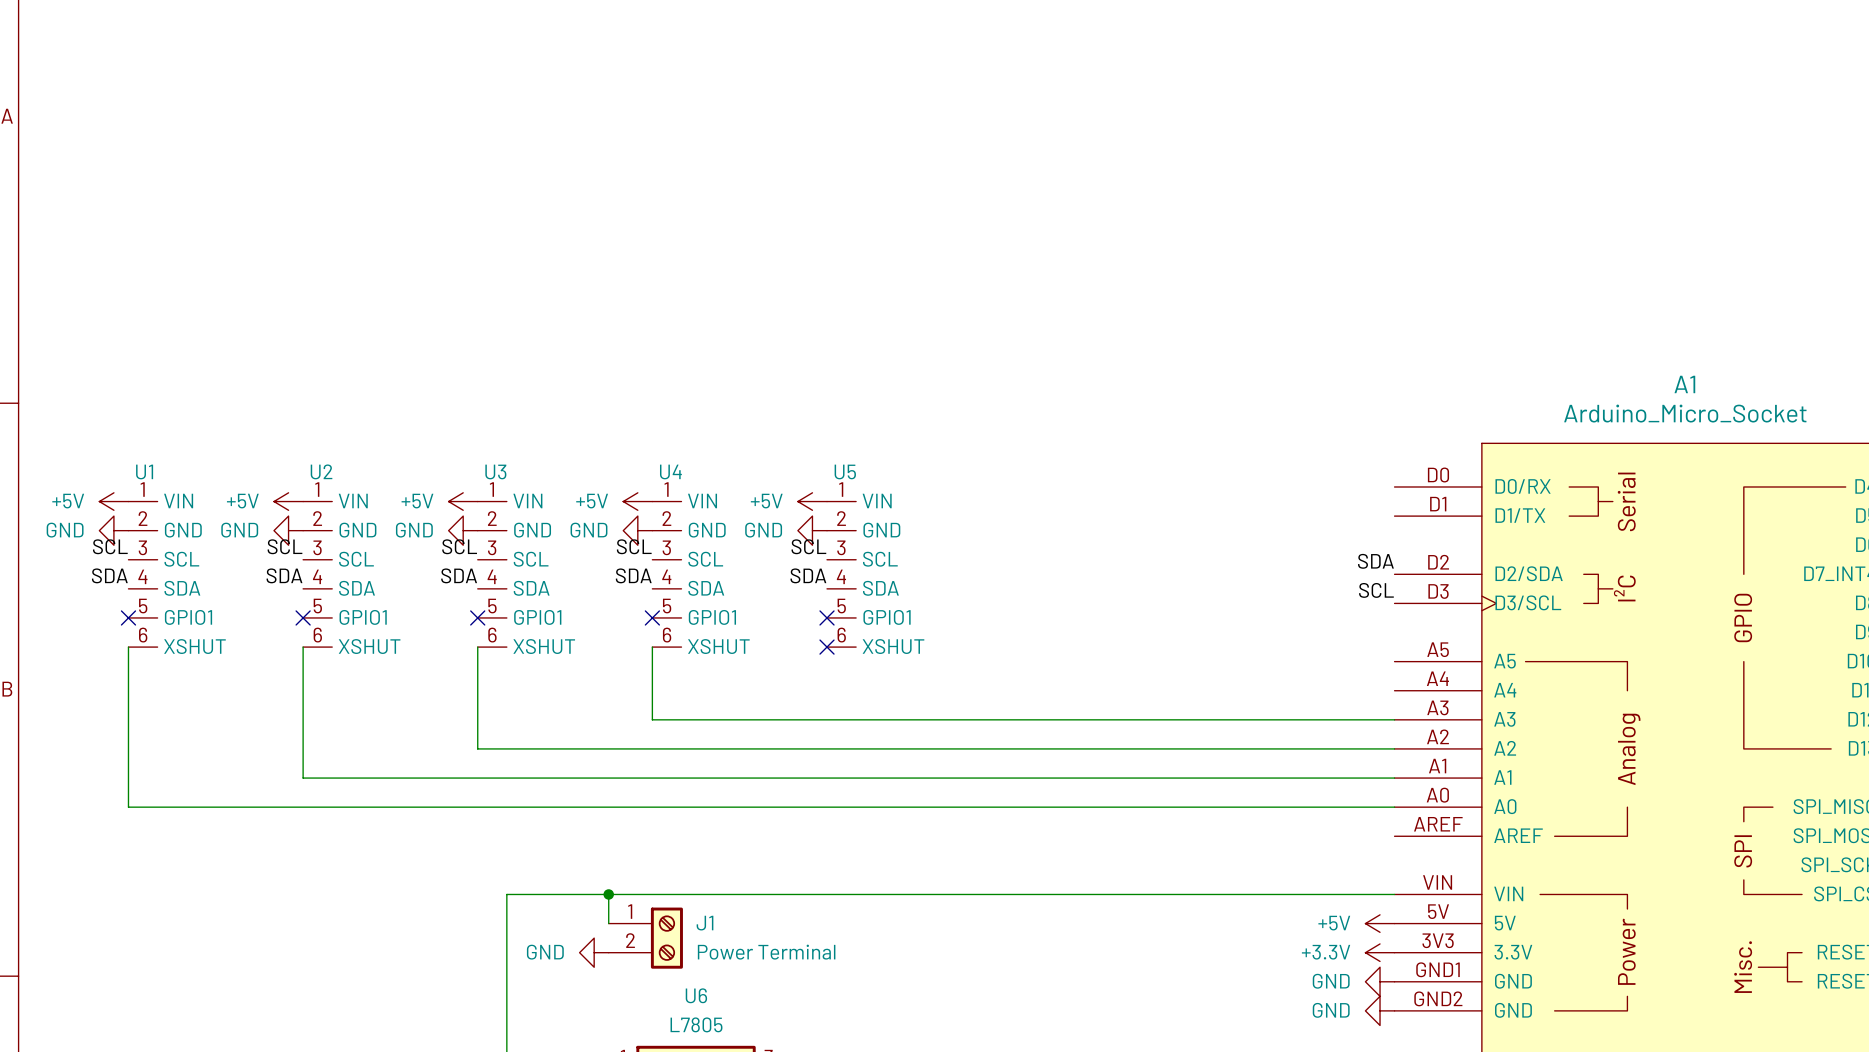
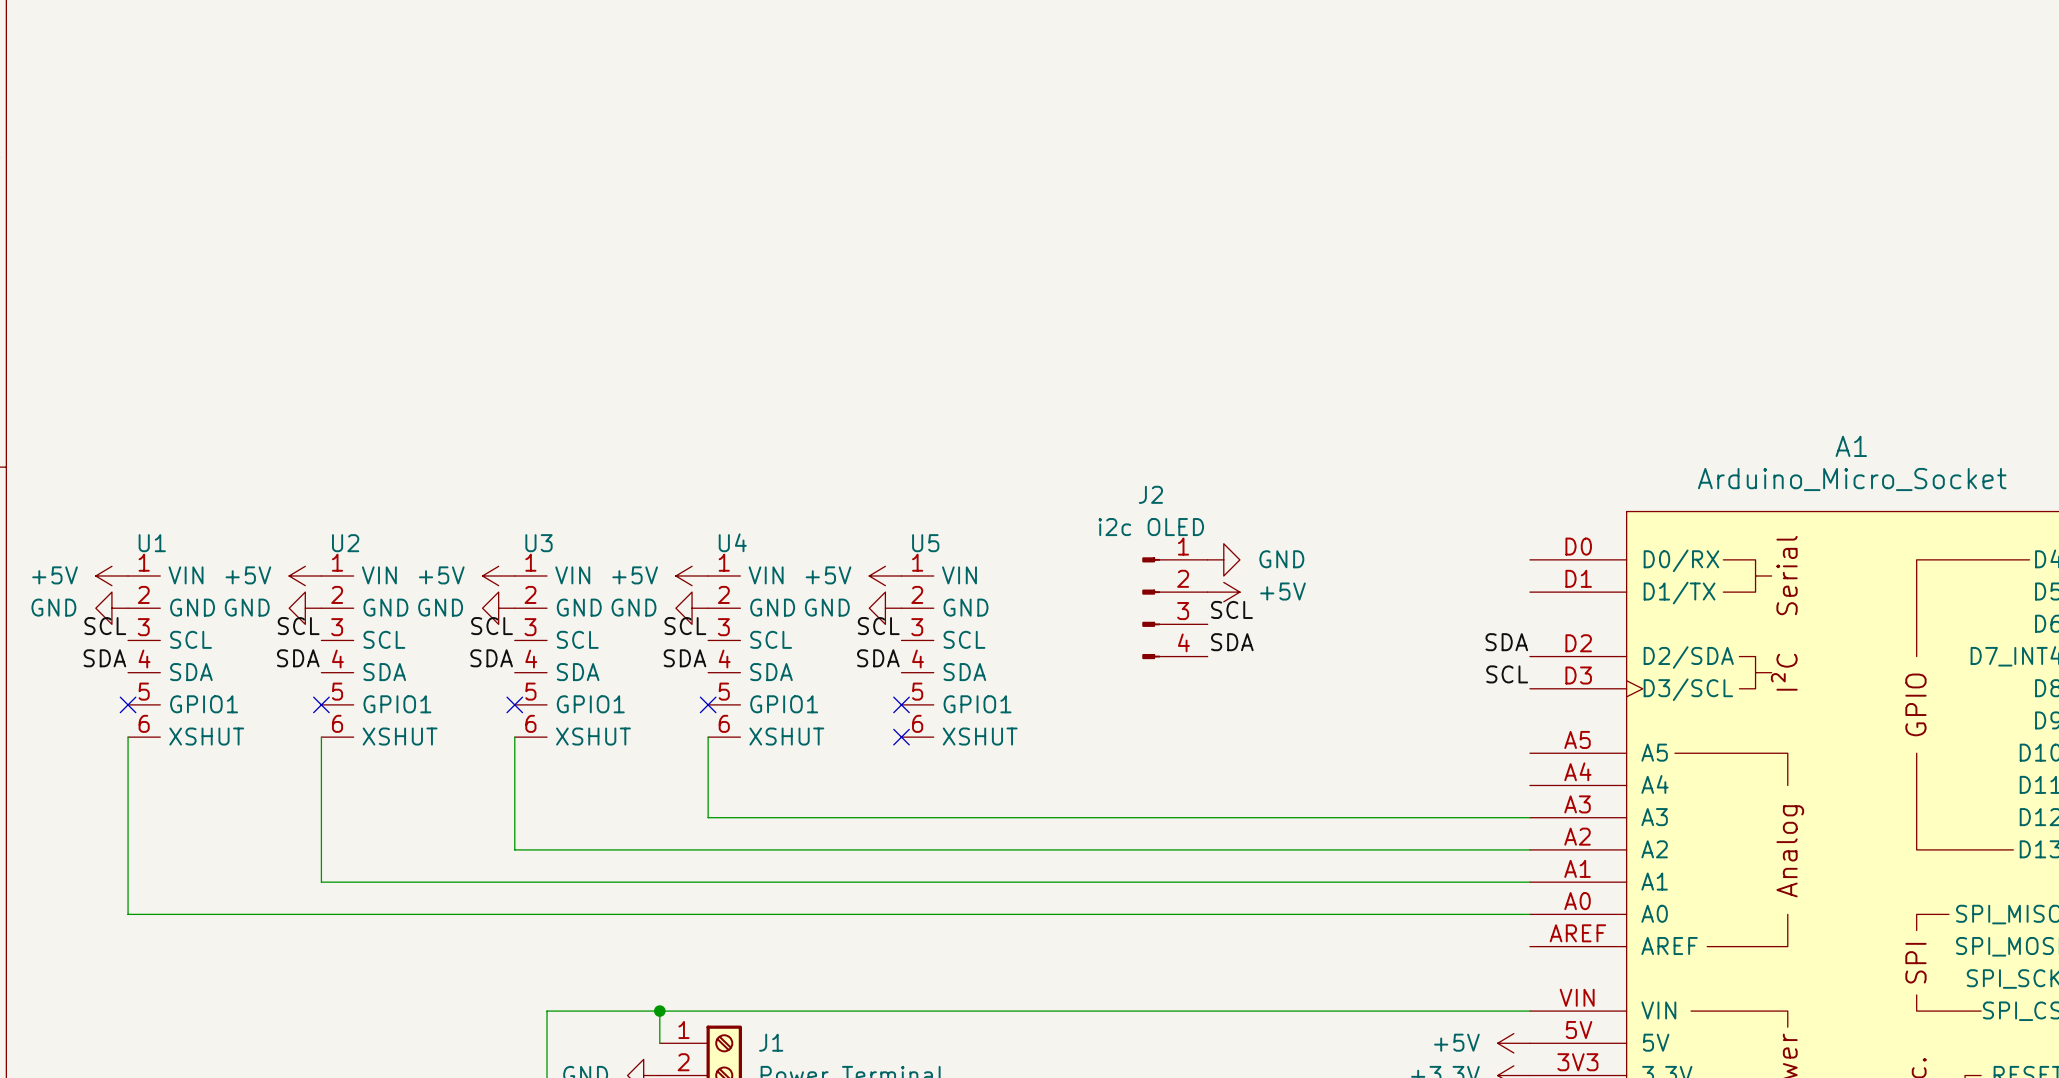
power symbol: none -> GND (1223, 559)
power symbol: none -> +5V (1223, 592)
J2: none -> i2c OLED (1174, 608)
label: none -> SCL (1231, 609)
label: none -> SDA (1232, 642)

